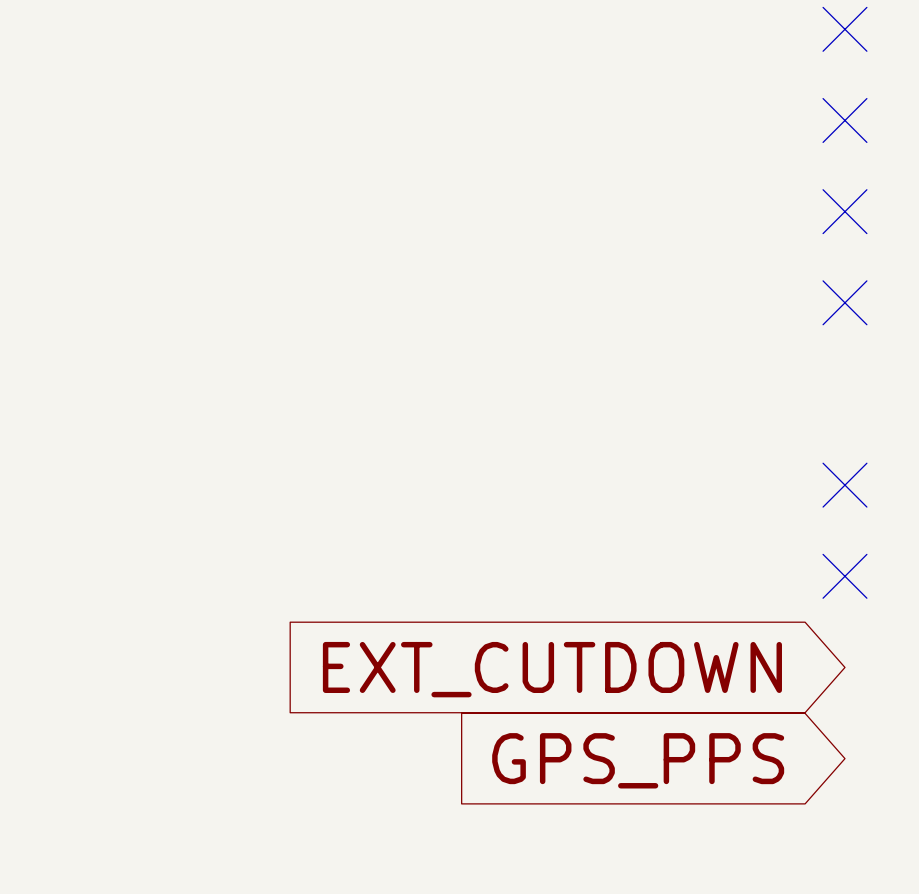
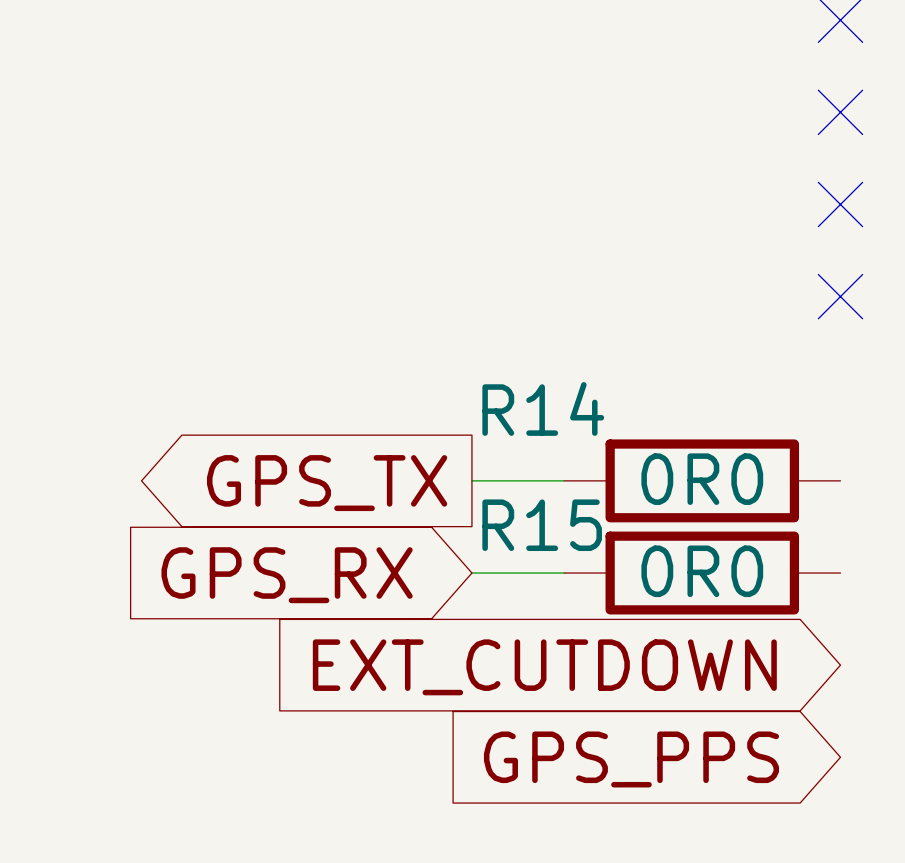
wire: none -> (471, 480) (564, 480)
R14: none -> 0R0 (702, 480)
no-connect mark: (844, 485) -> none
global label: none -> GPS_TX (327, 483)
wire: none -> (471, 573) (564, 573)
R15: none -> 0R0 (702, 573)
no-connect mark: (844, 576) -> none
global label: none -> GPS_RX (287, 575)

